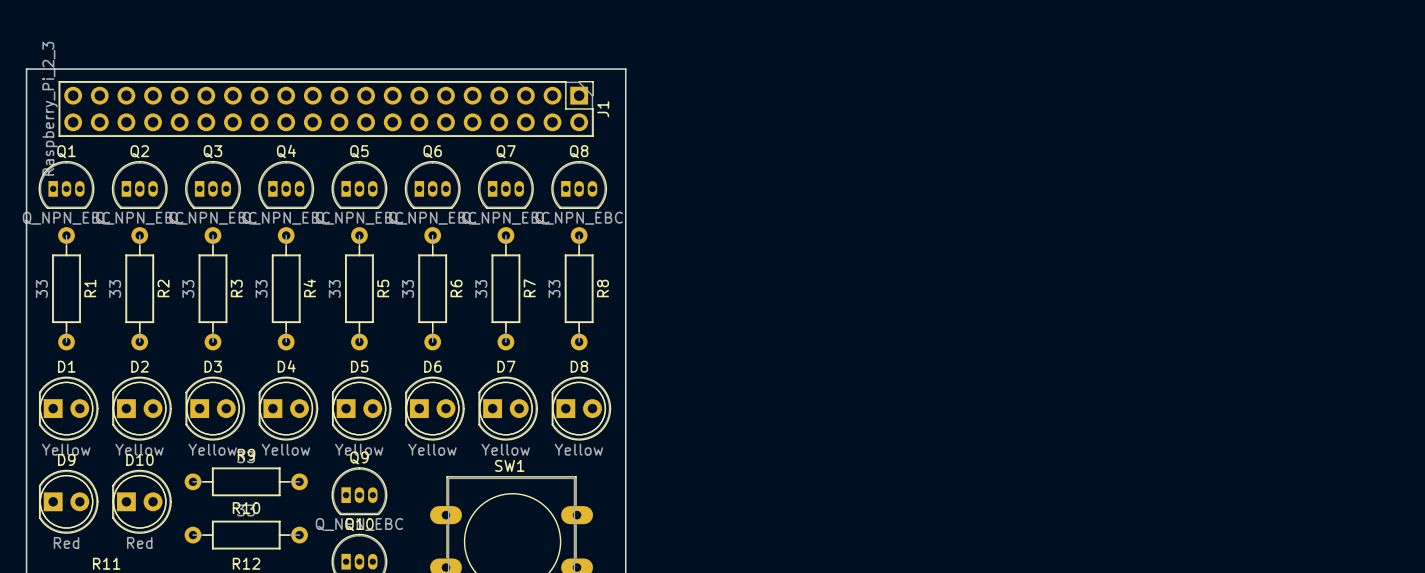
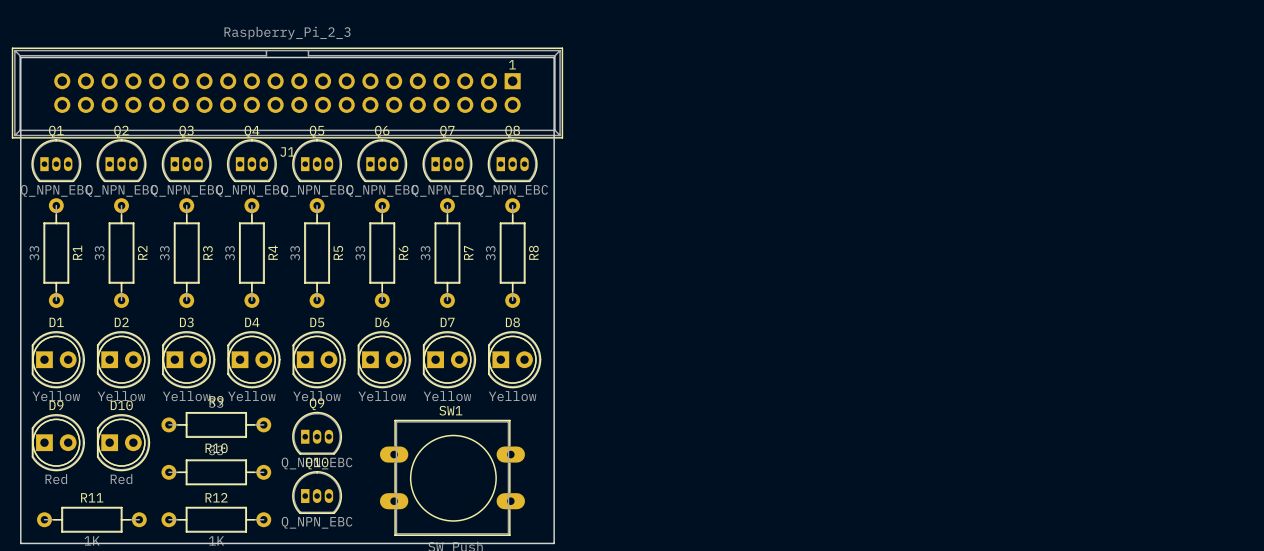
J1 footprint: [58, 81, 594, 137] -> [11, 47, 563, 139]
J1 value position: Raspberry_Pi_2_3 (50, 108) -> Raspberry_Pi_2_3 (287, 33)
J1 name position: J1 (603, 109) -> J1 (287, 152)

